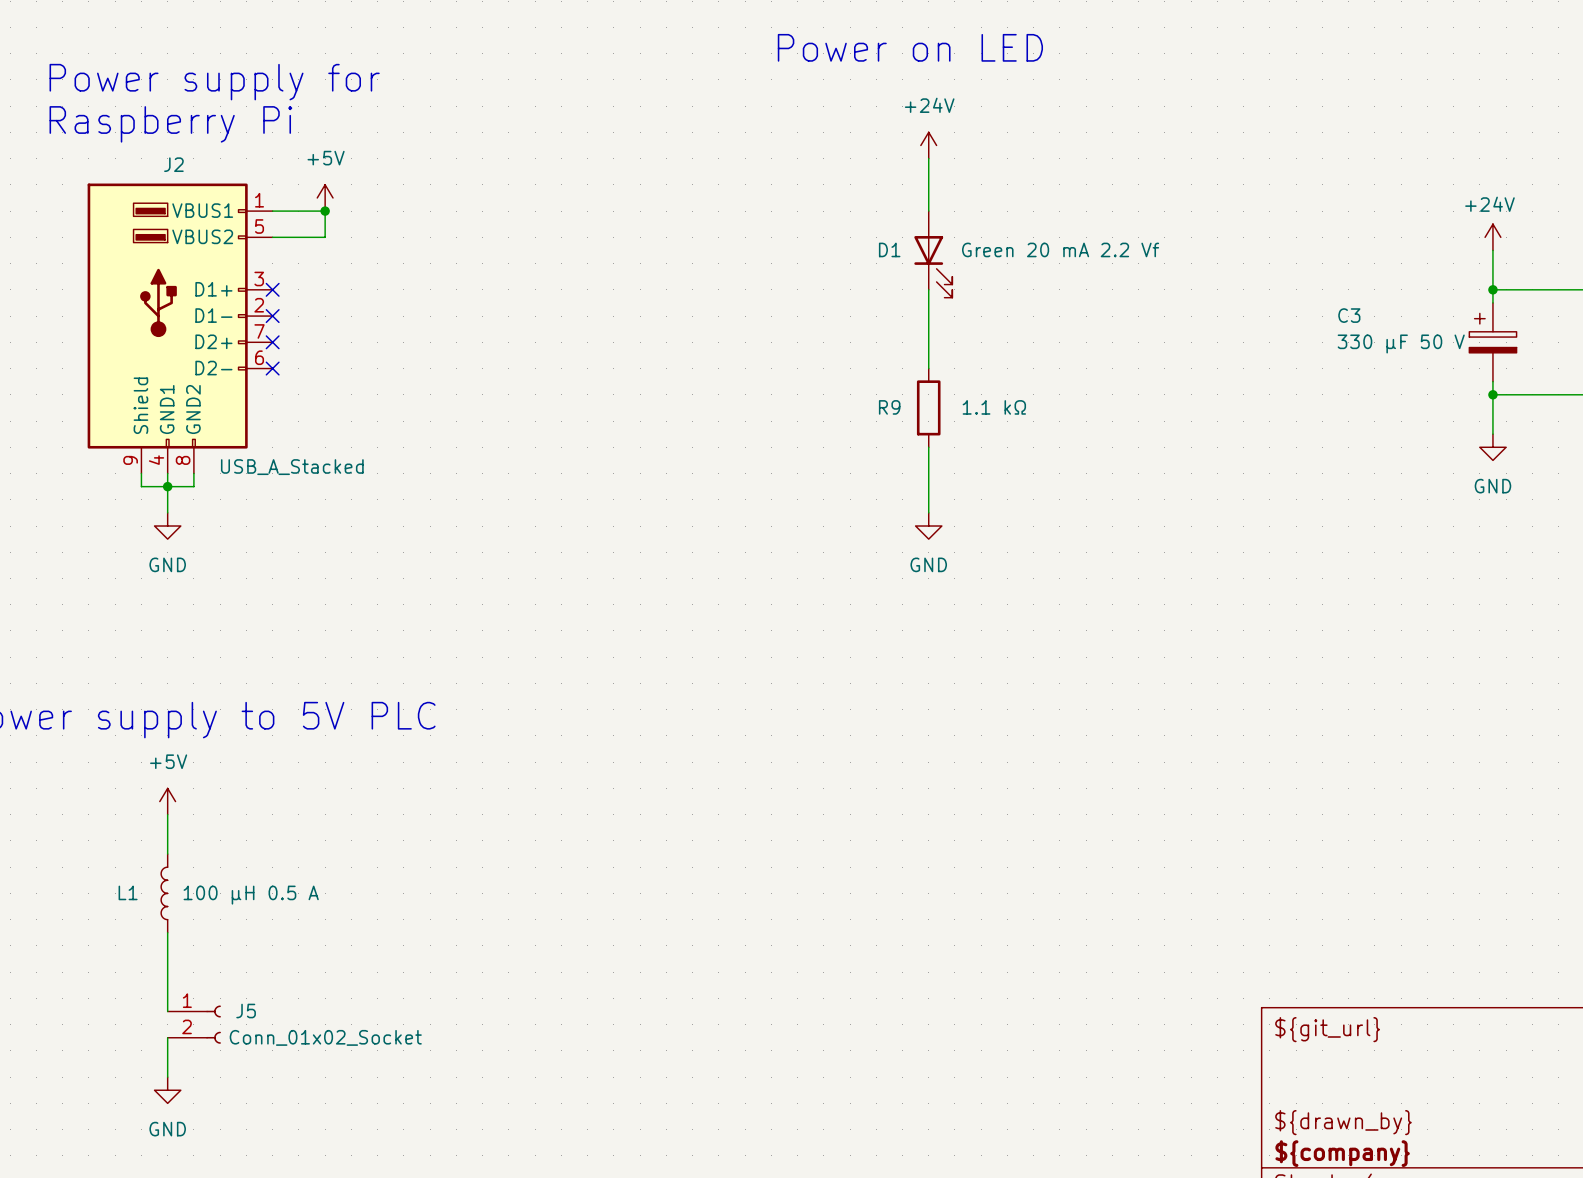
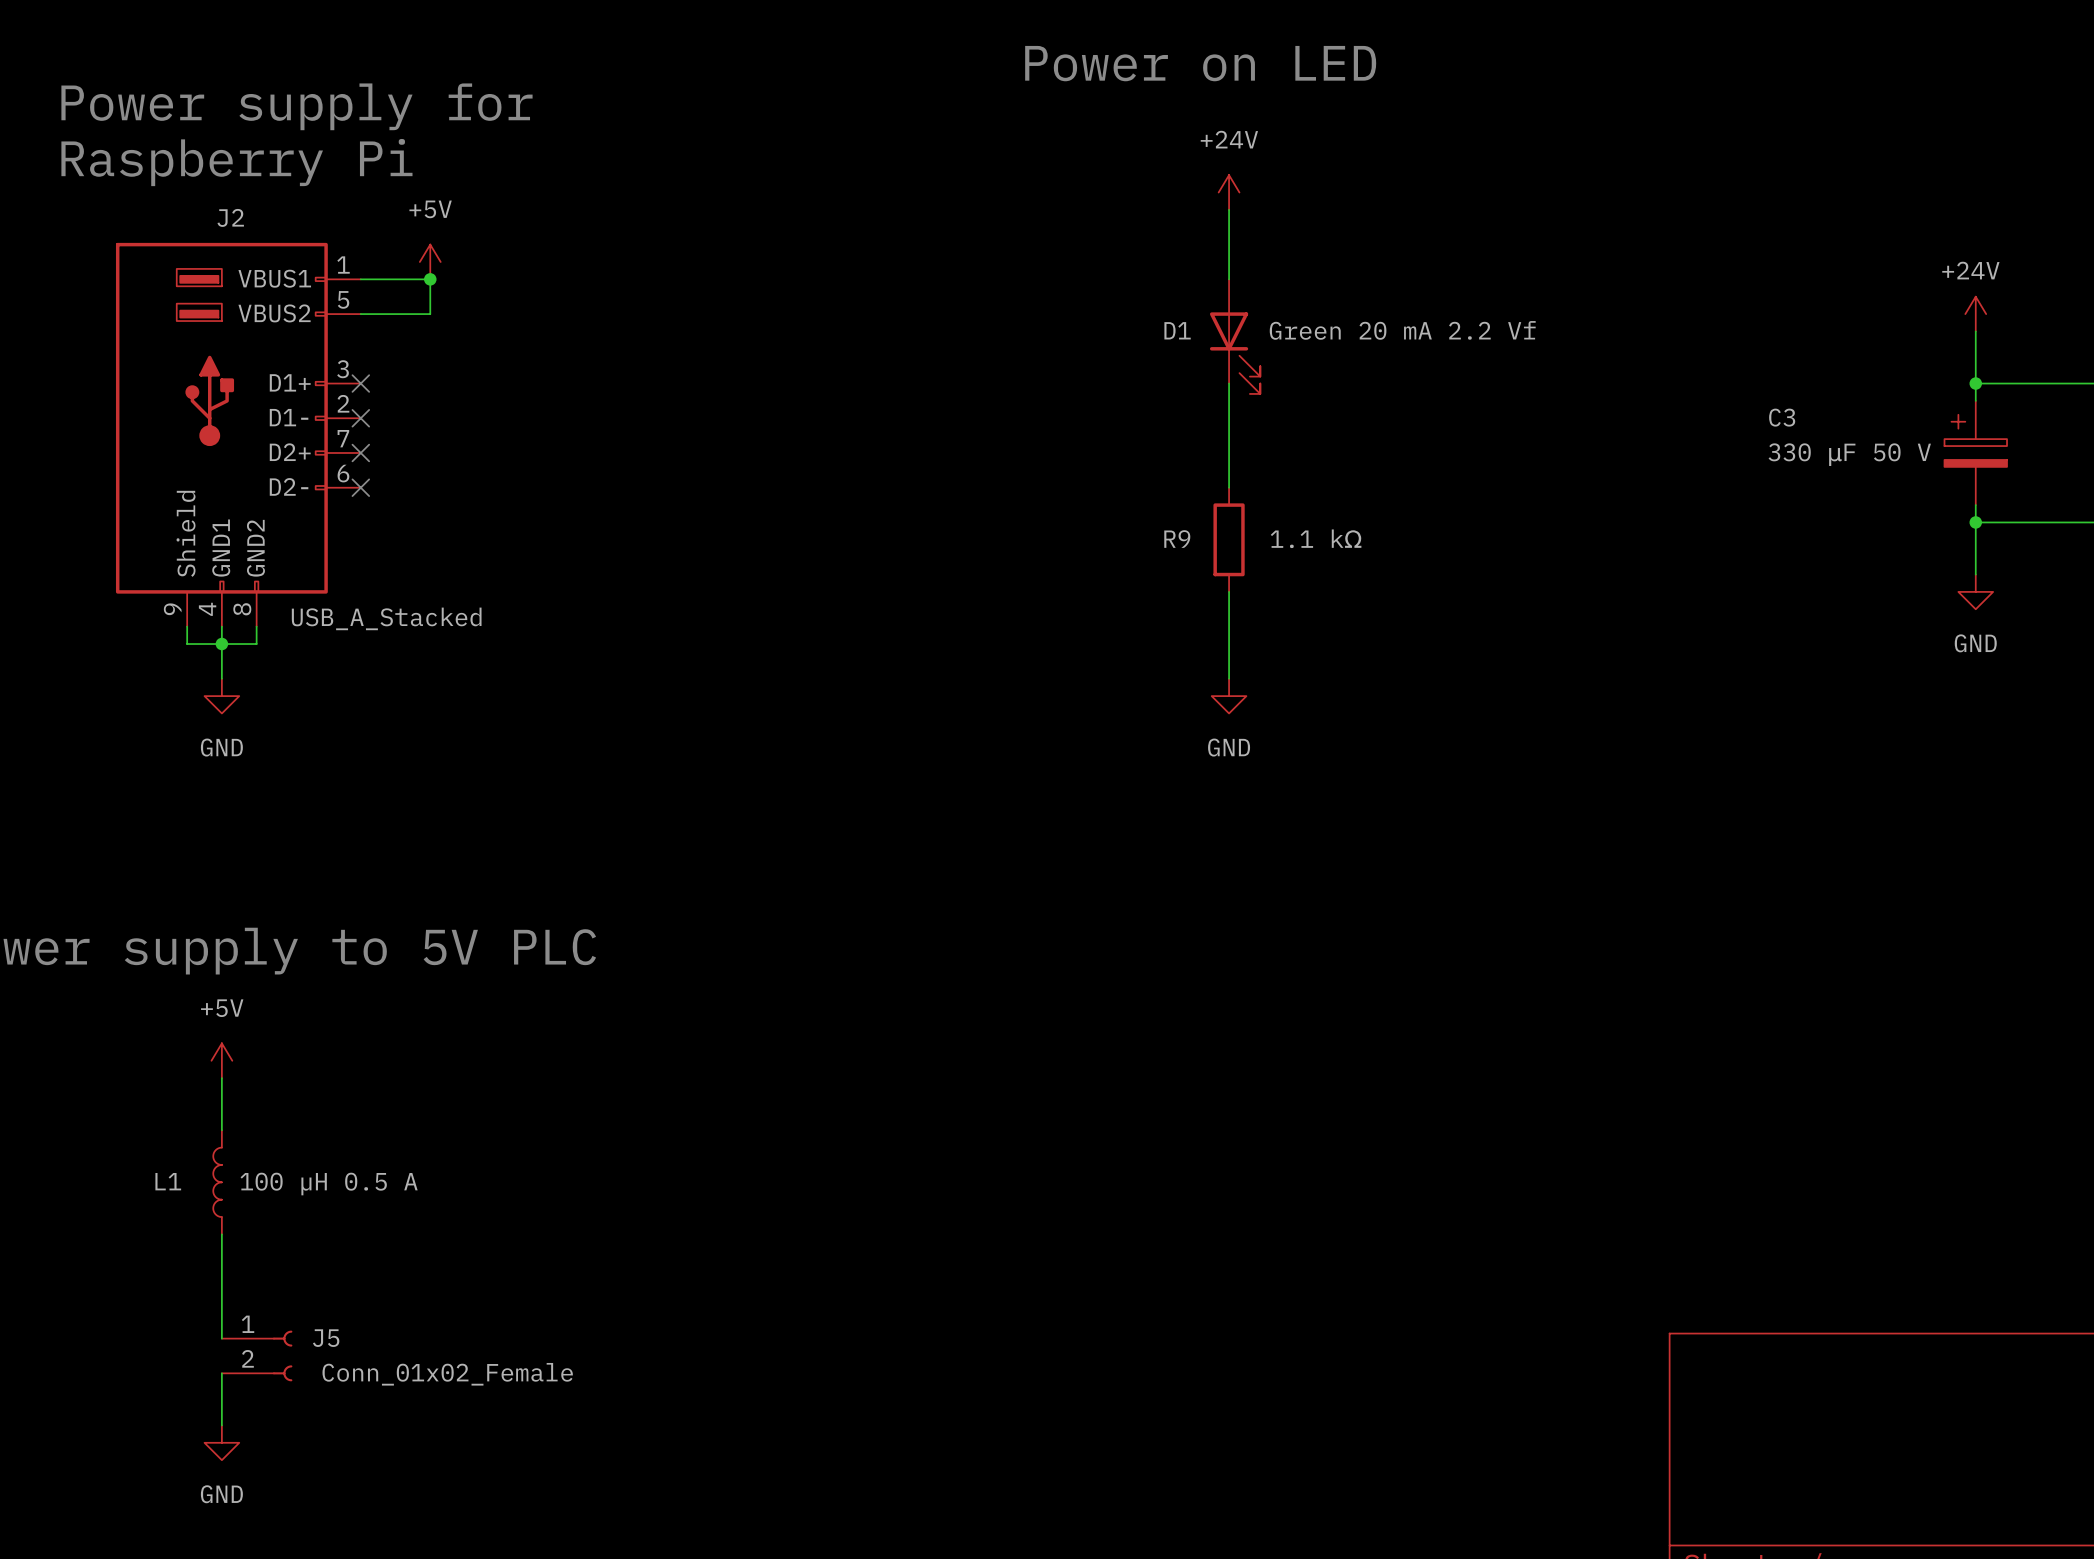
title block: ${git_url} (1327, 1029) -> none
J5 value: Conn_01x02_Socket (325, 1037) -> Conn_01x02_Female (447, 1374)
title block: ${drawn_by} (1343, 1122) -> none
title block: ${company} (1342, 1153) -> none

